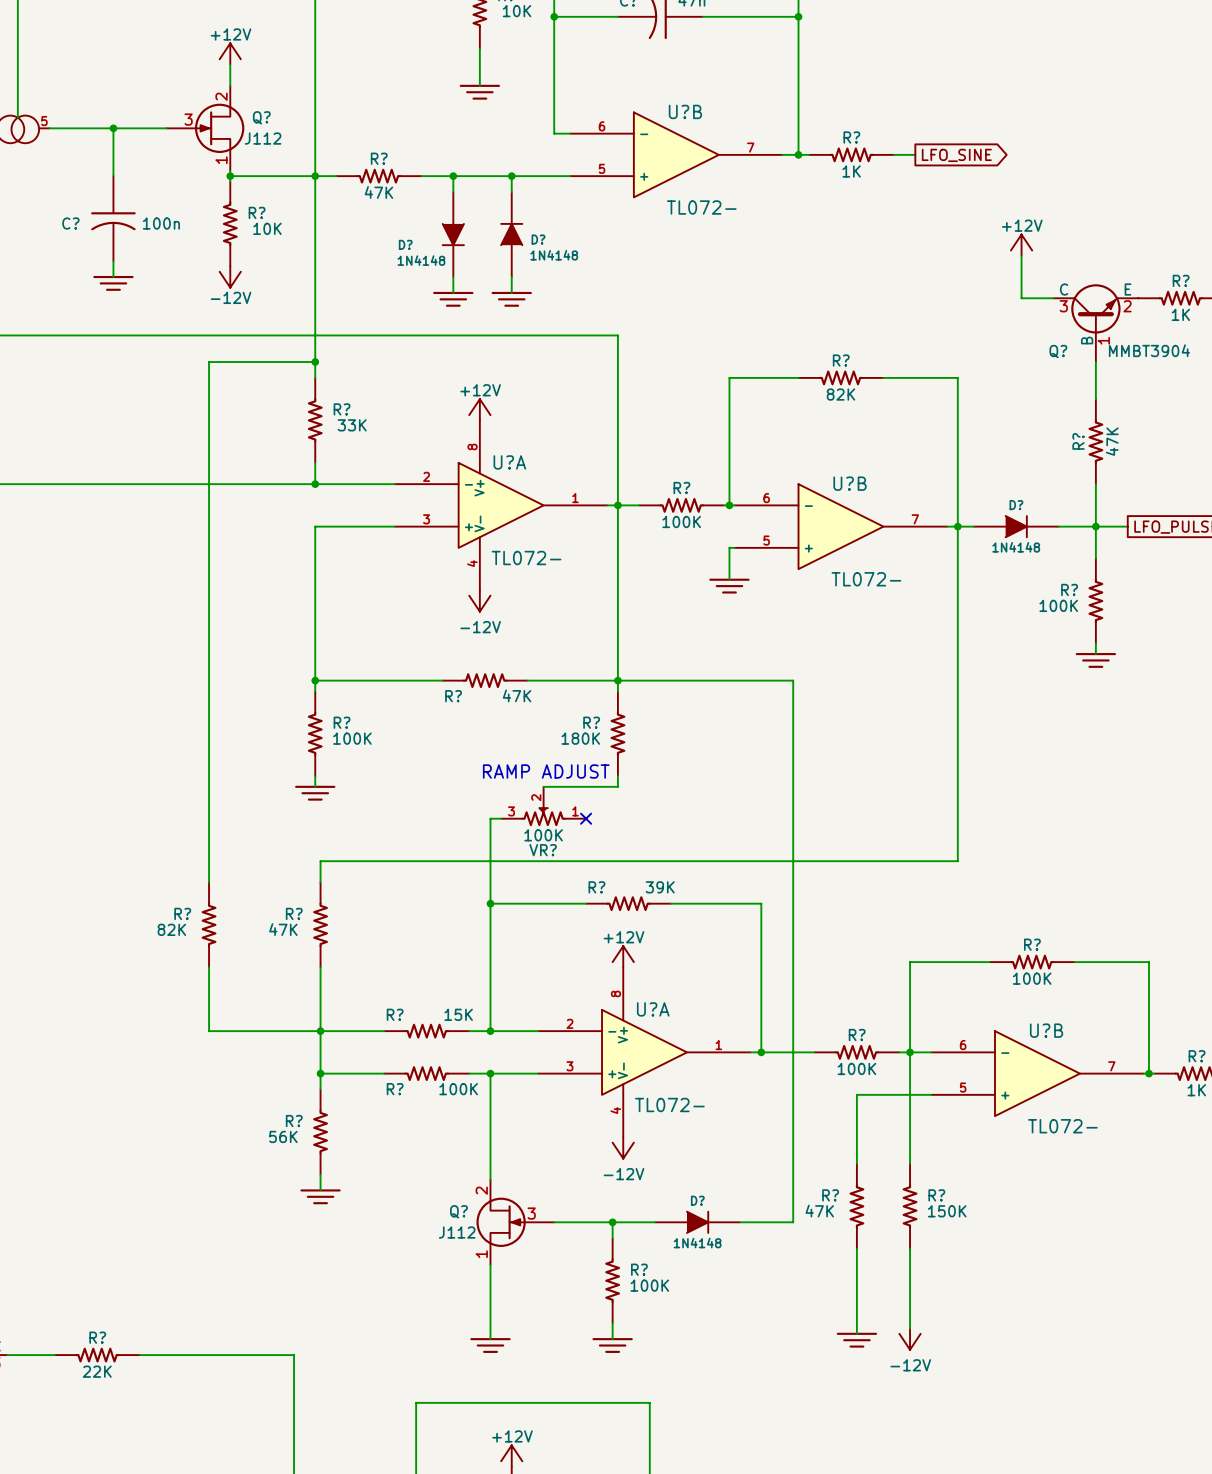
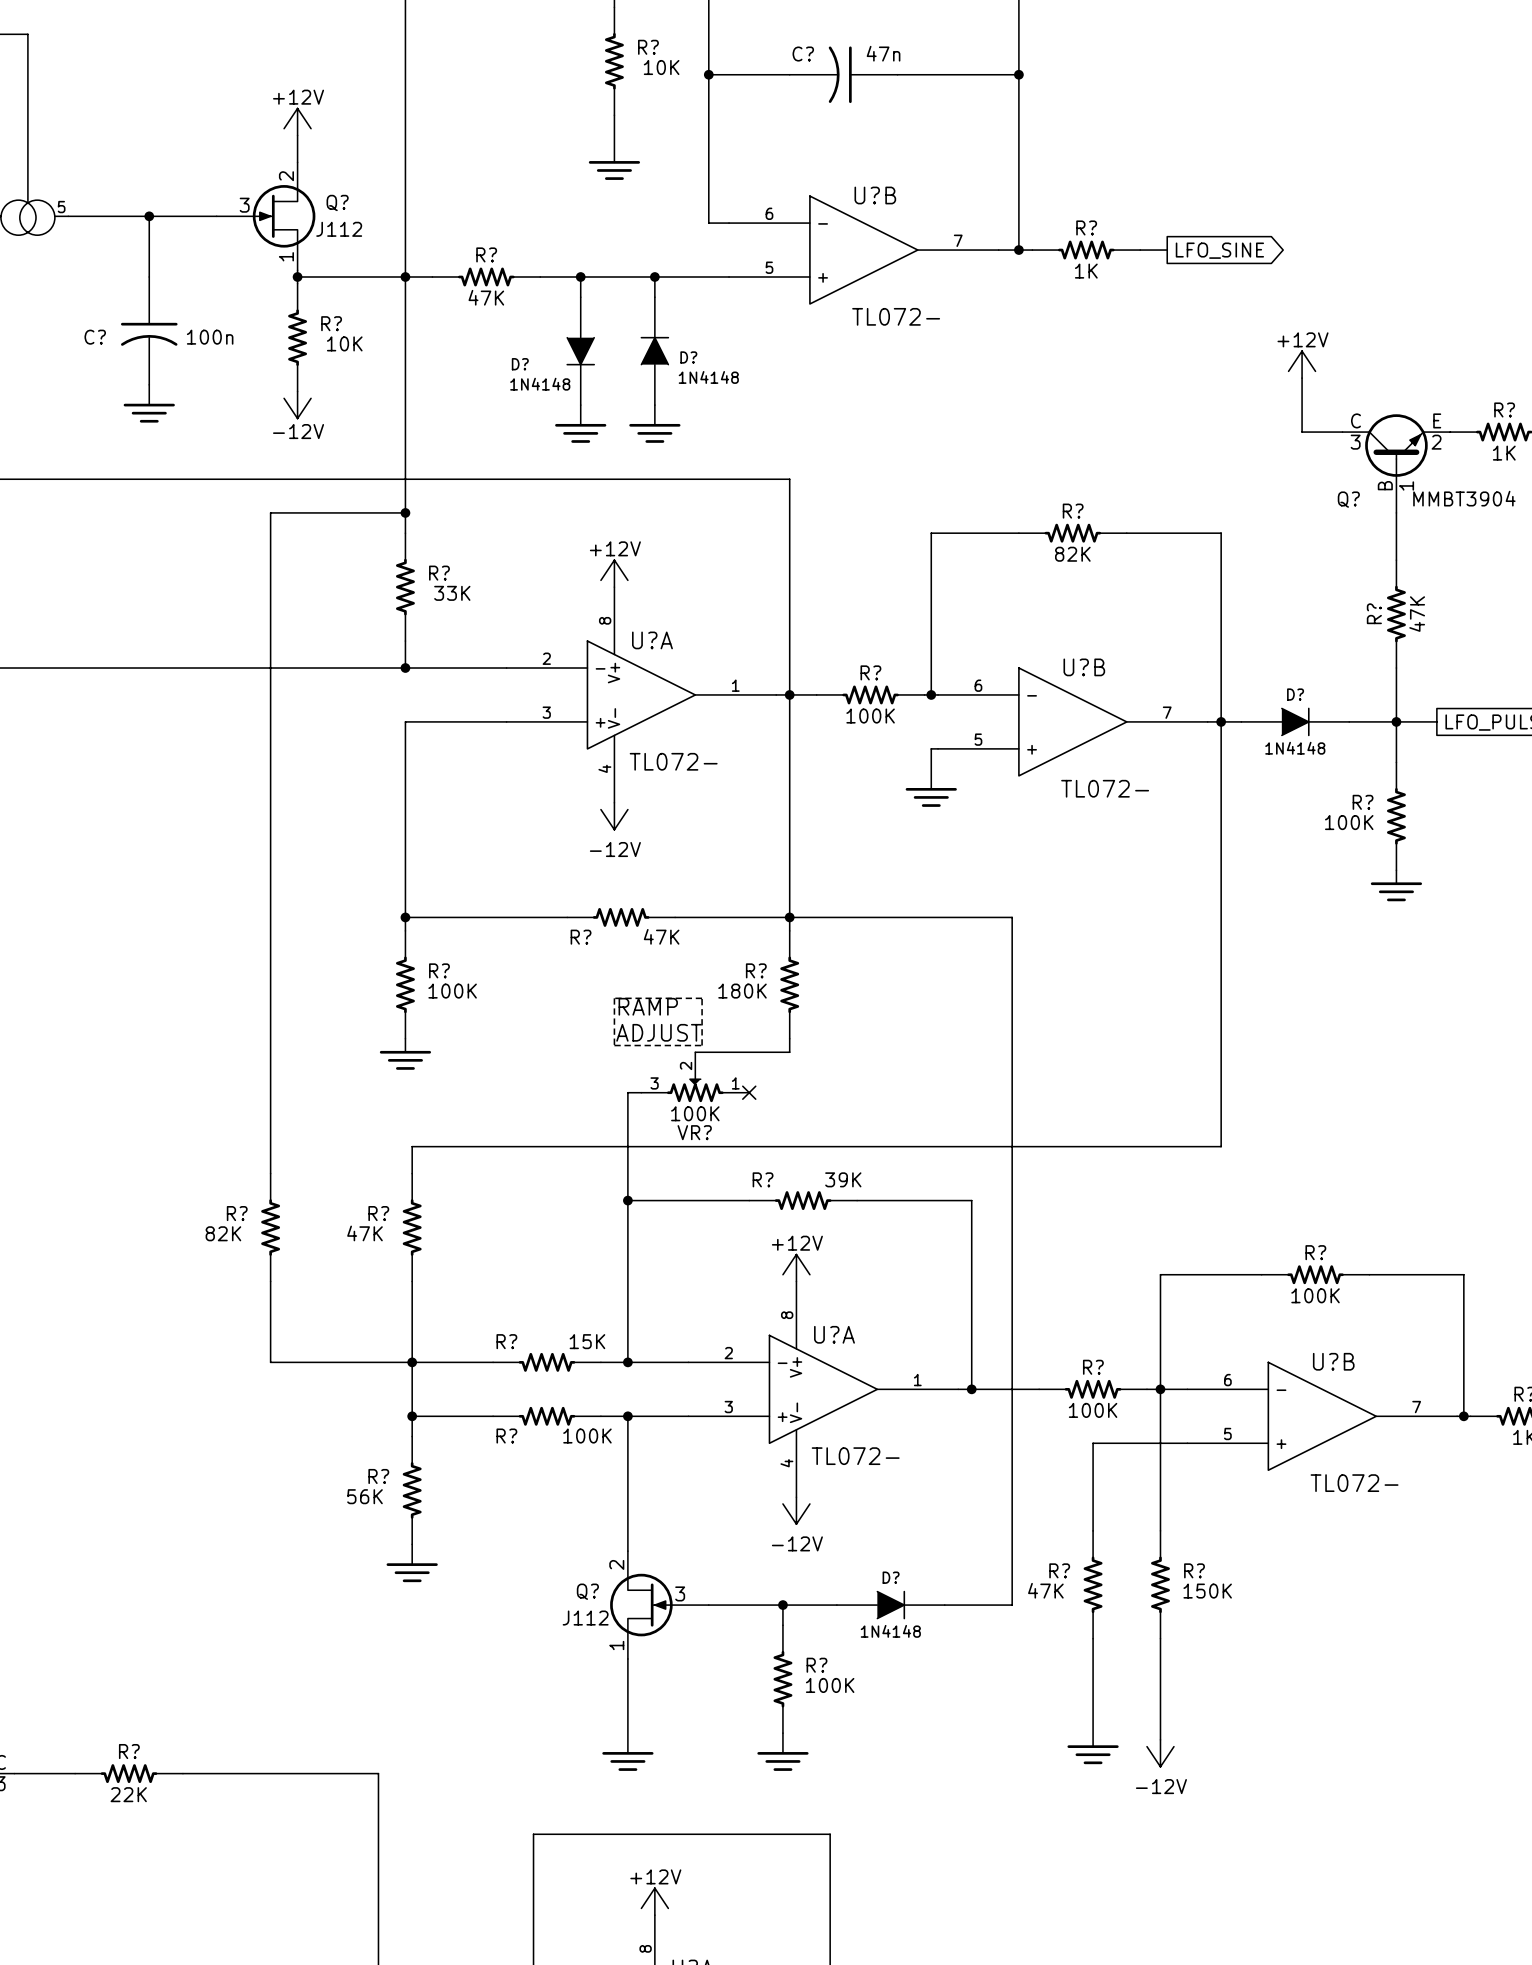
line: none -> (614, 998) (614, 1045) (702, 1045) (702, 998) (614, 998)
text: none -> RAMP (648, 1006)
text: RAMP ADJUST (546, 771) -> ADJUST (659, 1032)

